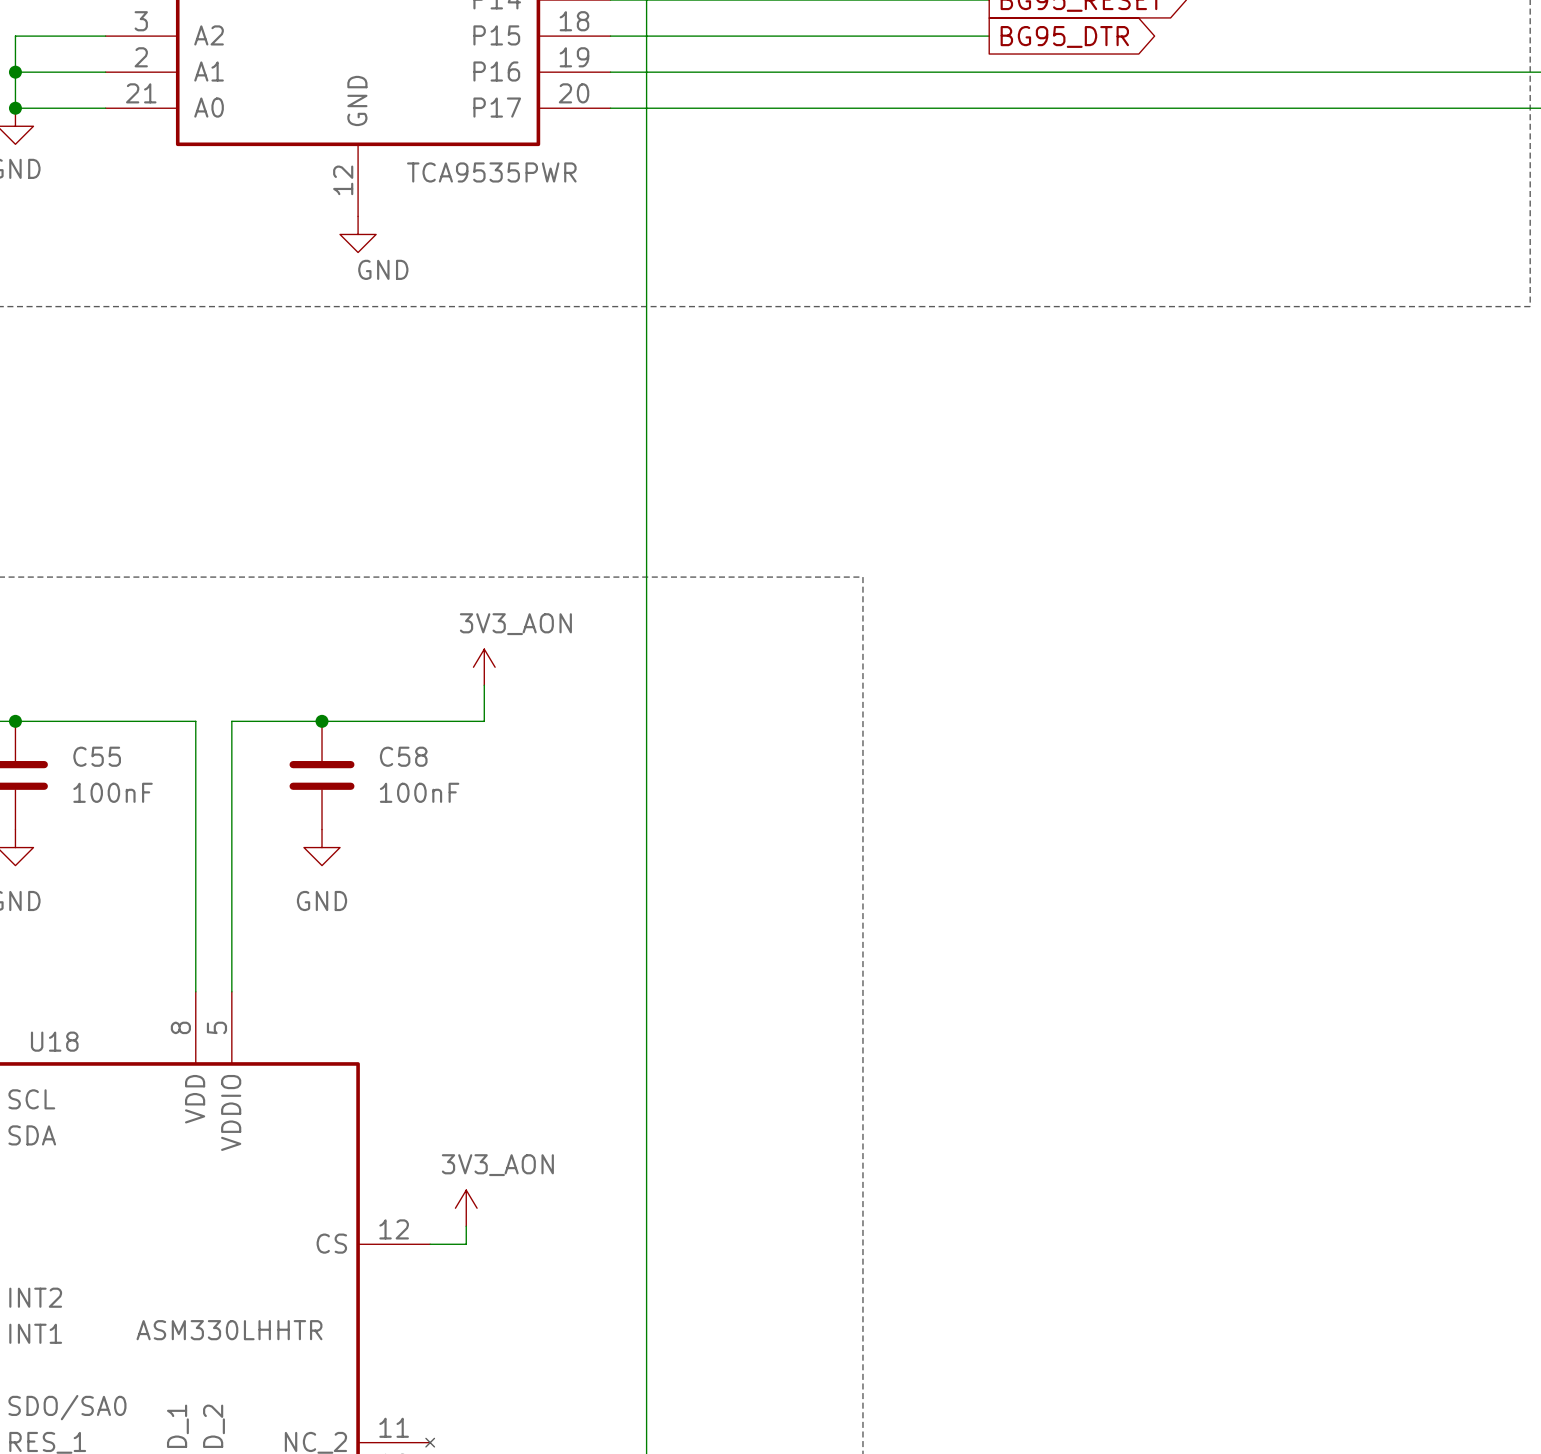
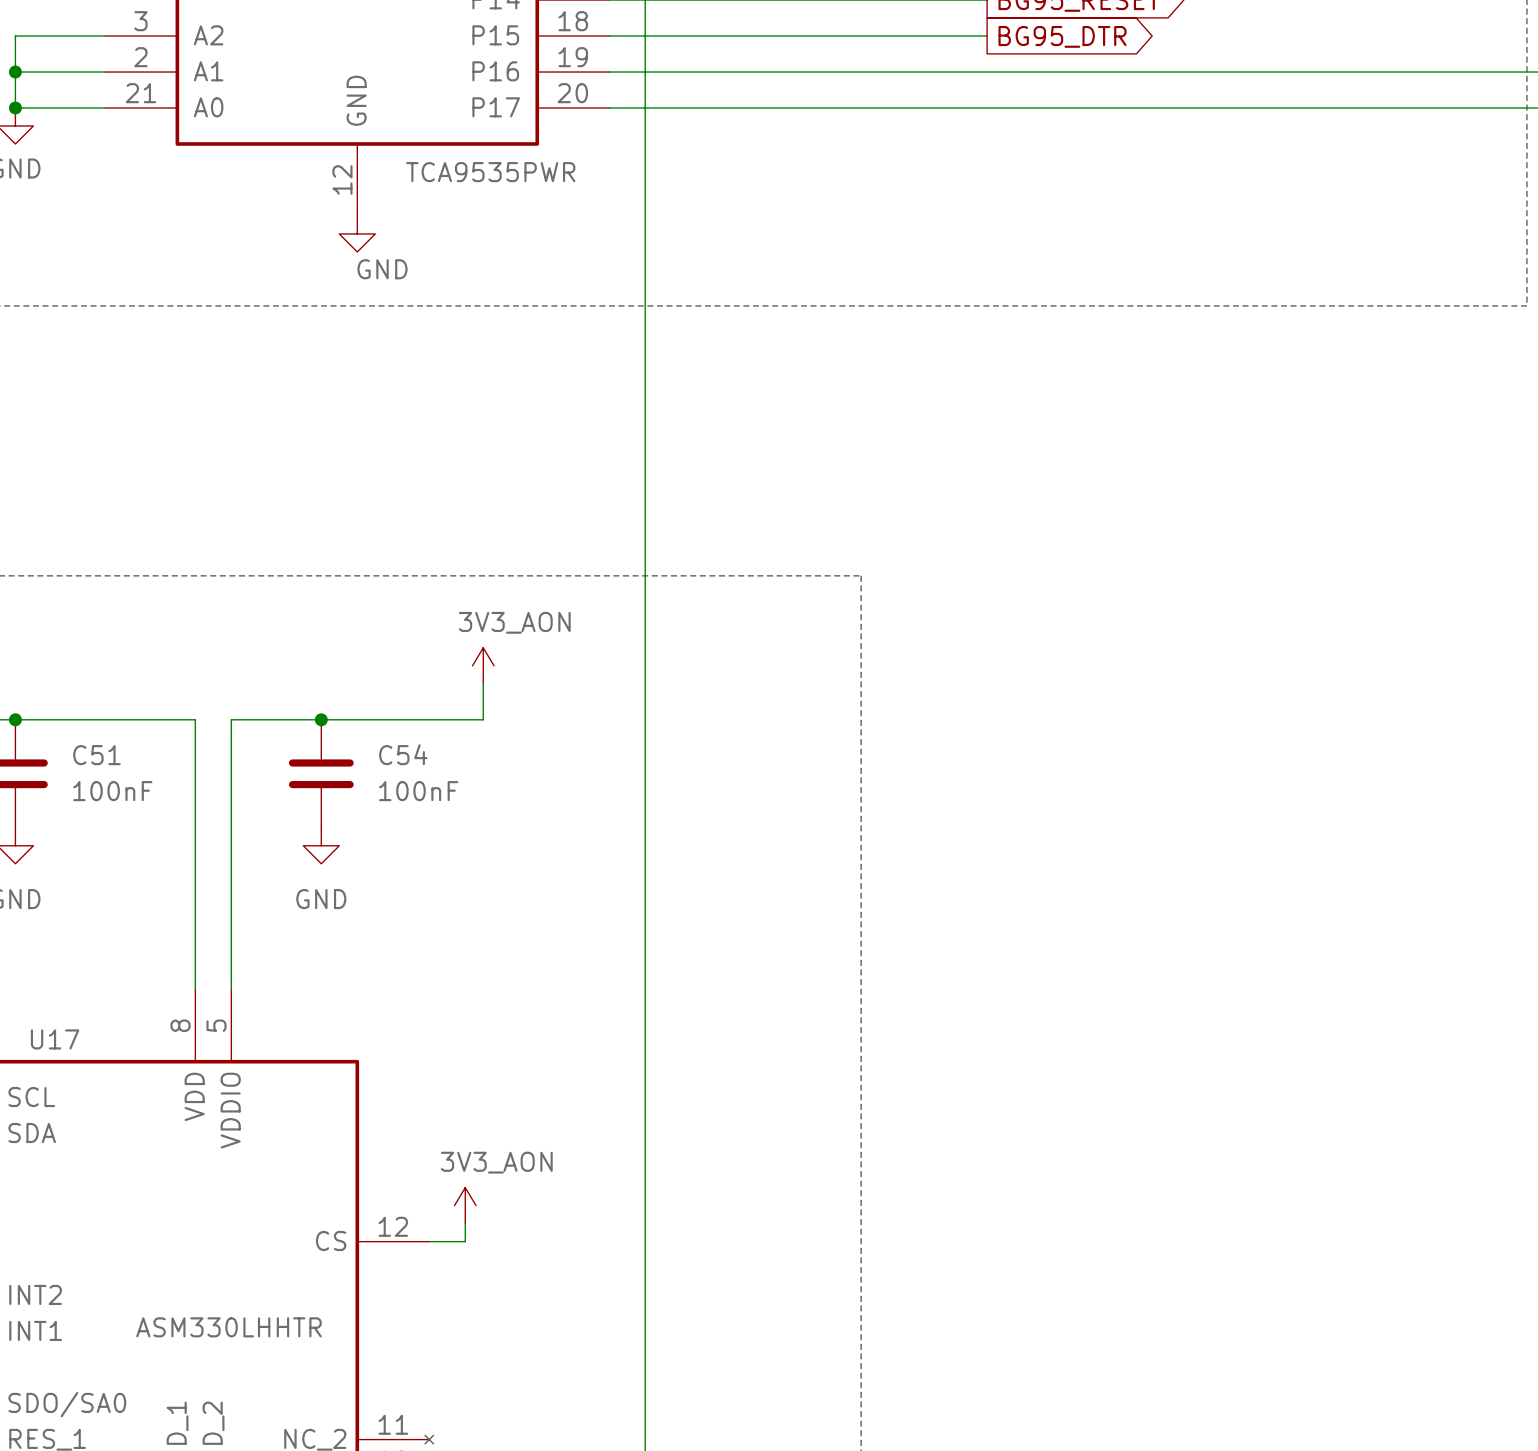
C55 name: C55 (97, 756) -> C51 (96, 755)
C58 name: C58 (403, 756) -> C54 (403, 754)
U18 name: U18 (54, 1041) -> U17 (55, 1039)

